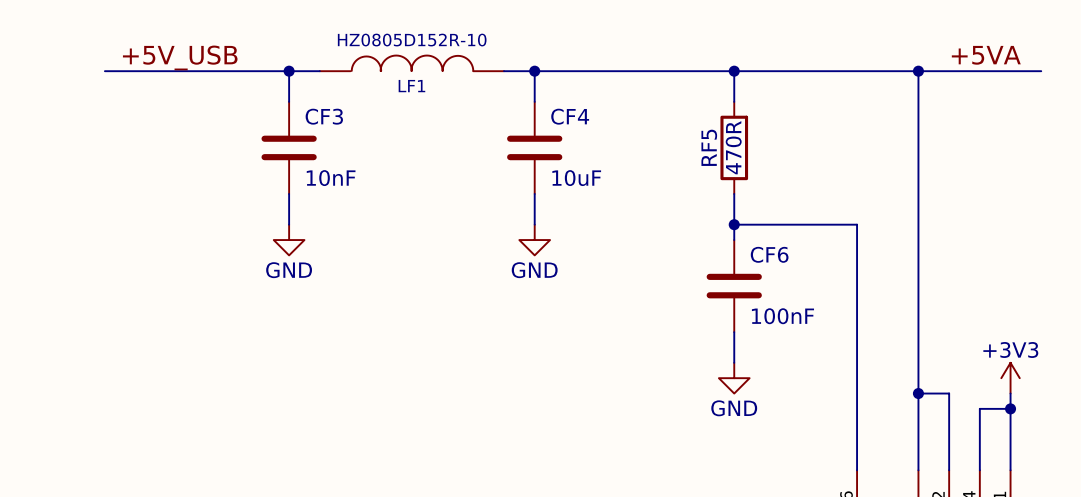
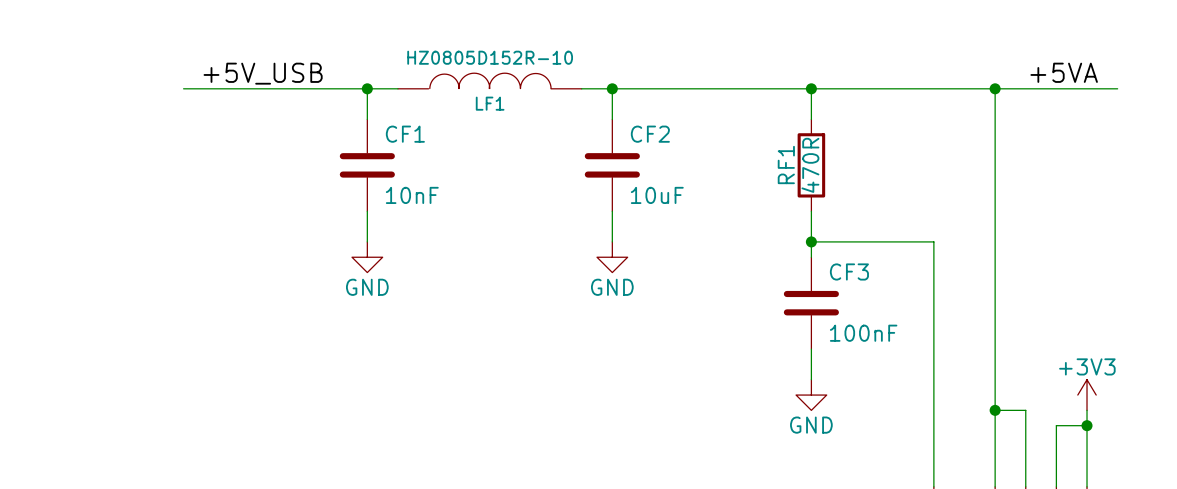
CF3 name: CF3 (324, 116) -> CF1 (405, 134)
CF4 name: CF4 (570, 116) -> CF2 (650, 134)
RF5 name: RF5 (709, 147) -> RF1 (786, 165)
CF6 name: CF6 (769, 254) -> CF3 (849, 271)

